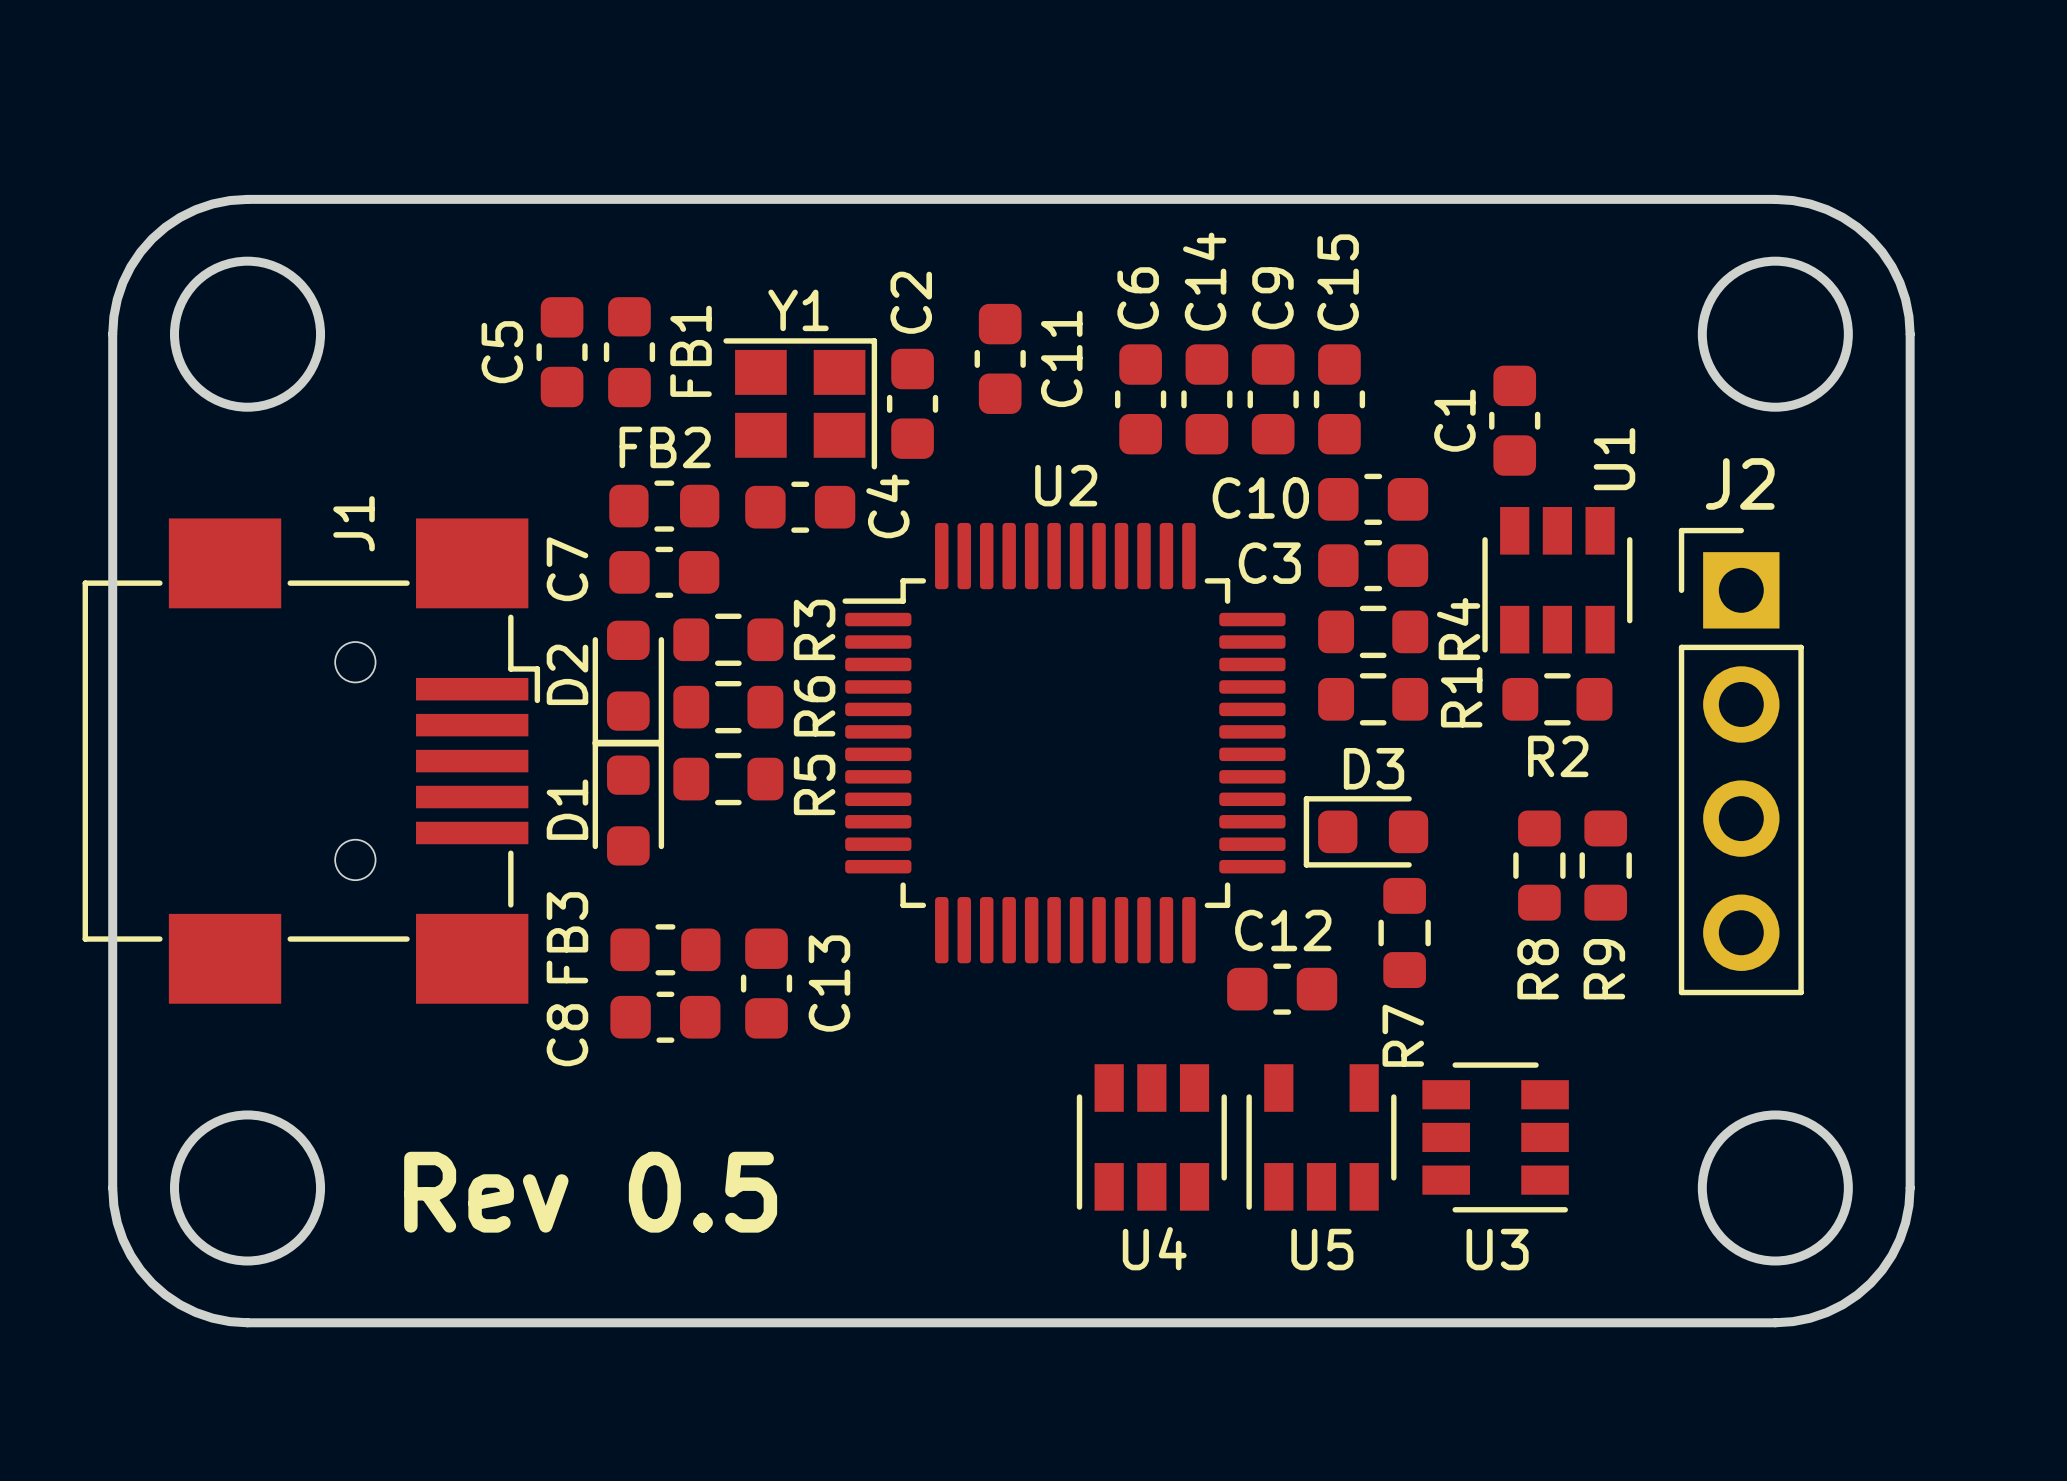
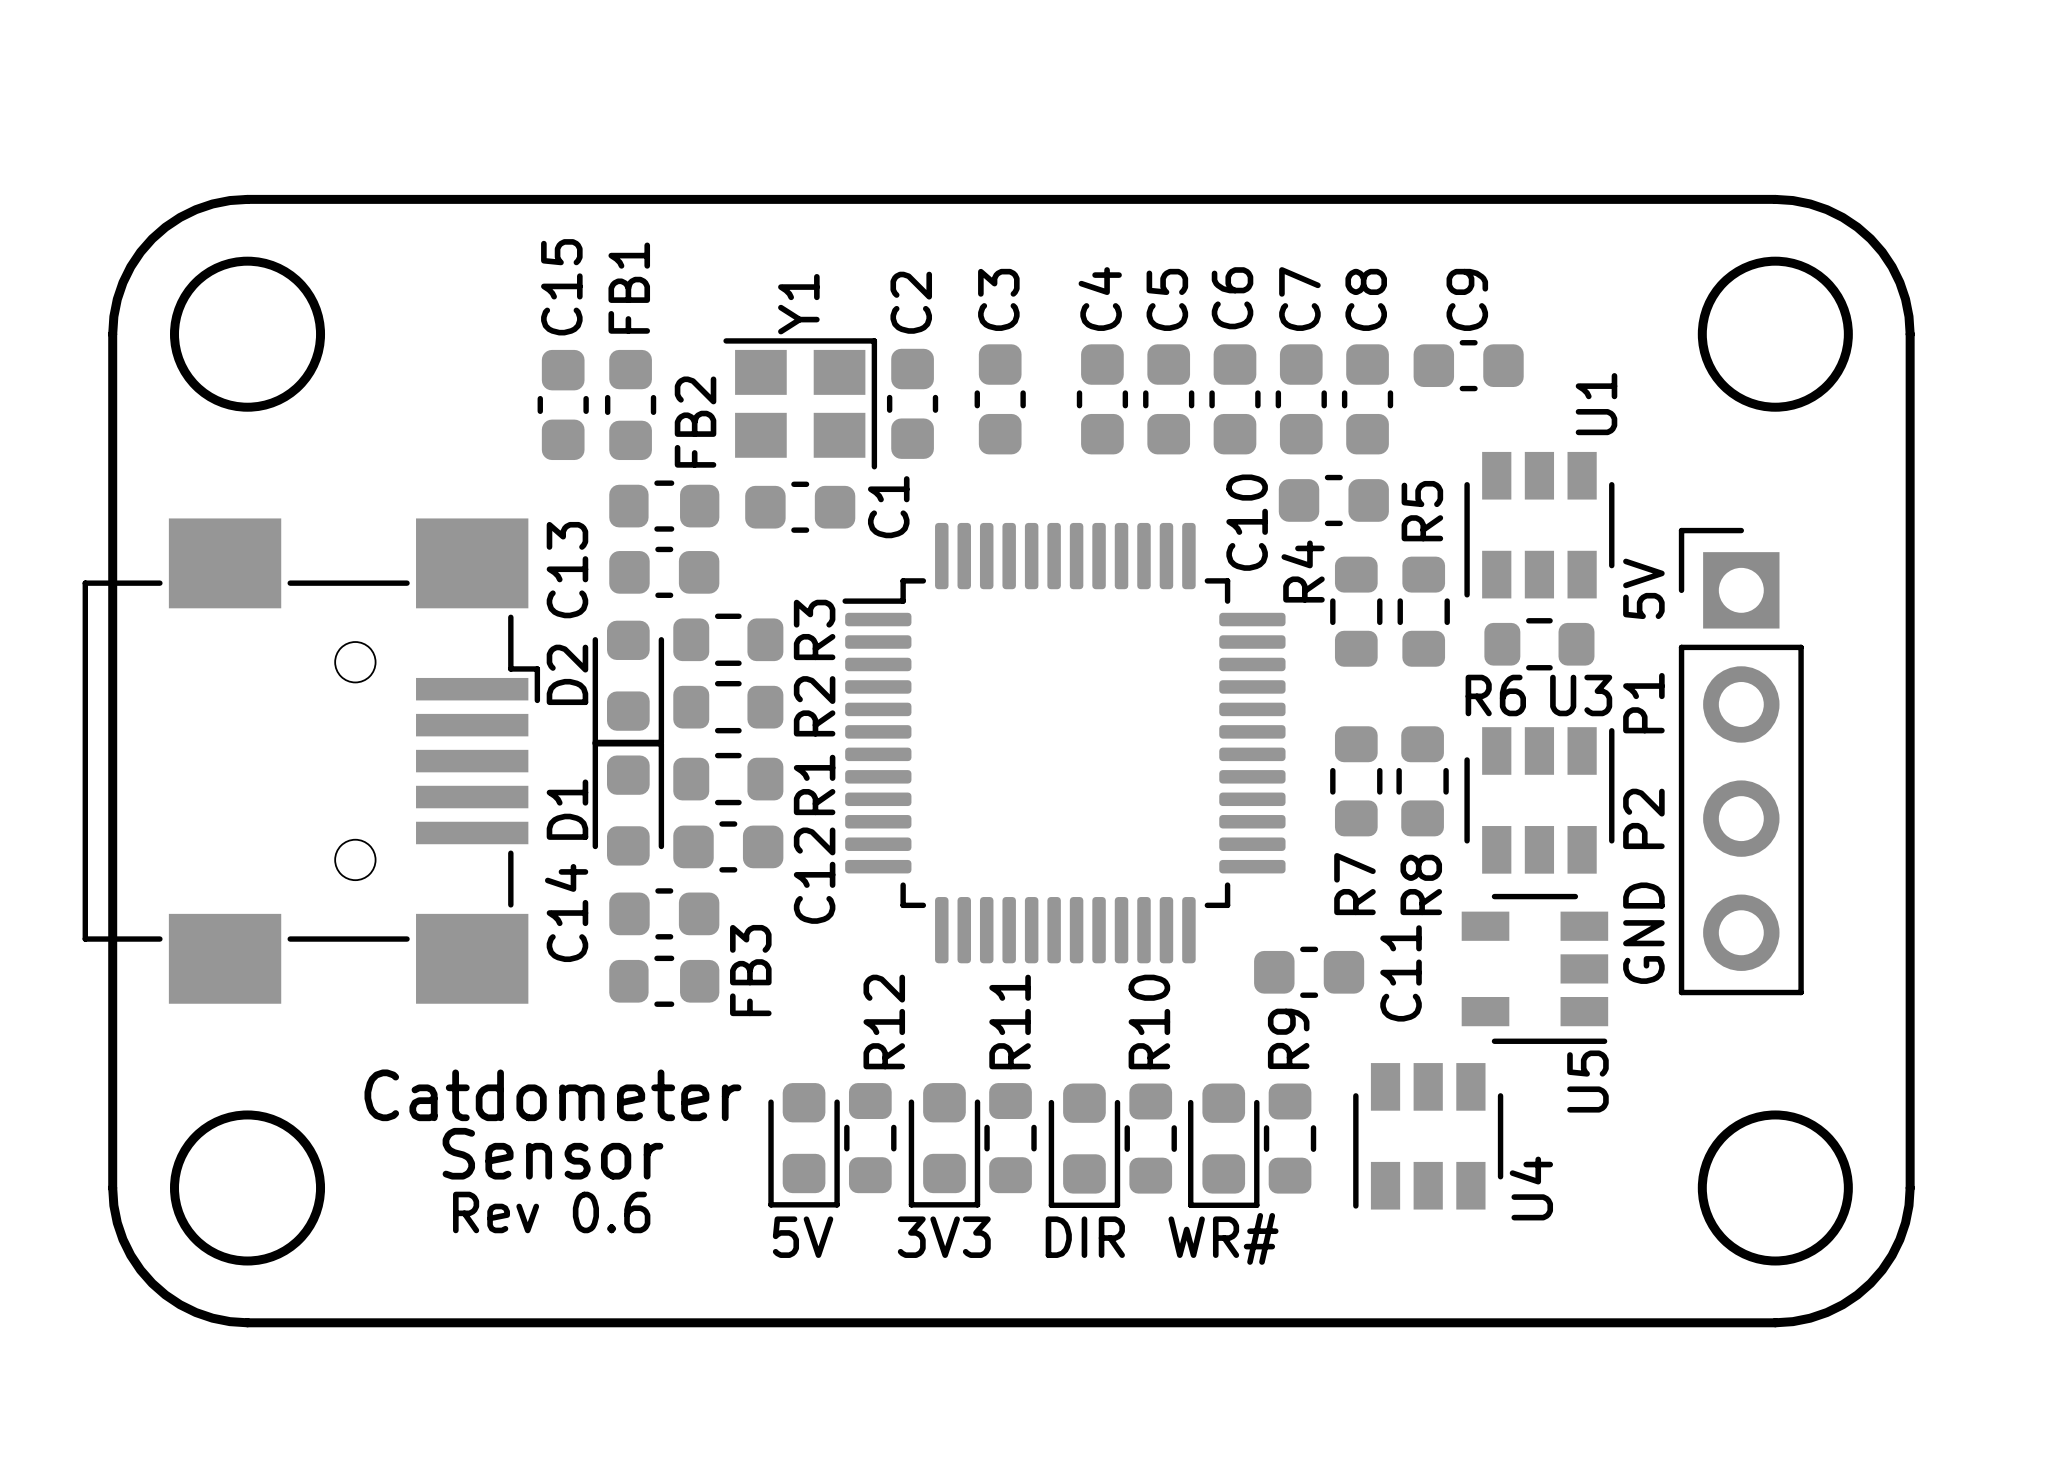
C14 name position: C14 (1204, 281) -> C14 (566, 913)
C15 name position: C15 (1338, 282) -> C15 (561, 287)
Y1 name rotation: 0° (798, 310) -> 90° counterclockwise (798, 304)
FB1 name position: FB1 (691, 351) -> FB1 (629, 288)
C5 name position: C5 (502, 352) -> C5 (1167, 299)
C5 position: (562, 352) -> (1168, 399)
FB1 position: (629, 352) -> (630, 404)
C11 rotation: 0° (1000, 358) -> 90° clockwise (1309, 972)
C11 position: (1000, 358) -> (1309, 972)
C4: none -> (1102, 399)
C6 position: (1140, 399) -> (1234, 399)
C14 rotation: 0° (1206, 399) -> 90° clockwise (664, 913)
C14 position: (1206, 399) -> (664, 913)
C9 rotation: 0° (1273, 399) -> 90° clockwise (1468, 365)
C9 position: (1273, 399) -> (1468, 365)
C7: none -> (1301, 399)
C15 position: (1339, 399) -> (563, 404)
C1: (1514, 420) -> none
FB2 name rotation: 0° (665, 447) -> 90° counterclockwise (695, 422)
J2 name: J2 (1740, 483) -> none
U2 name: U2 (1066, 485) -> none
C10 name rotation: 0° (1260, 497) -> 90° counterclockwise (1247, 522)
C10 position: (1373, 499) -> (1333, 500)
C4 name: C4 (887, 506) -> C1 (888, 507)
J1 name: J1 (354, 523) -> none
C3 rotation: 0° (1373, 565) -> 90° clockwise (1000, 399)
C3 position: (1373, 565) -> (1000, 399)
C7 name: C7 (567, 569) -> C13 (567, 570)
U1 position: (1557, 580) -> (1539, 525)
text: none -> 5V (1643, 588)
R5: none -> (1423, 611)
R4 name position: R4 (1458, 629) -> R4 (1303, 571)
R4 rotation: 0° (1373, 631) -> 90° clockwise (1356, 611)
R6: none -> (1539, 644)
R1: (1373, 699) -> none
R2: (1557, 699) -> none
text: none -> P1 (1643, 703)
R6 name: R6 (814, 706) -> R2 (814, 706)
R5 name: R5 (814, 784) -> R1 (814, 784)
text: none -> P2 (1643, 818)
D3: (1365, 831) -> none
R8 position: (1539, 865) -> (1422, 781)
R9 position: (1605, 865) -> (1290, 1138)
C12 name rotation: 0° (1283, 930) -> 90° counterclockwise (814, 875)
R7 position: (1404, 932) -> (1356, 781)
text: none -> GND (1643, 933)
FB3 name position: FB3 (567, 937) -> FB3 (750, 970)
FB3 position: (665, 949) -> (664, 981)
R9 name position: R9 (1604, 969) -> R9 (1288, 1038)
C13: (766, 983) -> none
C12 position: (1282, 989) -> (728, 846)
C8 rotation: 0° (665, 1017) -> 90° clockwise (1367, 399)
C8 position: (665, 1017) -> (1367, 399)
text: none -> Catdometer (552, 1095)
U4 position: (1151, 1137) -> (1428, 1136)
U5 rotation: 0° (1321, 1137) -> 90° counterclockwise (1534, 968)
U5 position: (1321, 1137) -> (1534, 968)
U3 rotation: 0° (1495, 1137) -> 90° counterclockwise (1539, 800)
U3 position: (1495, 1137) -> (1539, 800)
R12: none -> (870, 1138)
R11: none -> (1010, 1138)
R10: none -> (1150, 1138)
part: none -> (804, 1145)
part: none -> (944, 1145)
part: none -> (1084, 1145)
part: none -> (1223, 1145)
text: none -> Sensor (552, 1153)
text: Rev 0.5 (590, 1192) -> Rev 0.6 (551, 1212)
text: none -> 5V (803, 1237)
text: none -> 3V3 (944, 1237)
text: none -> DIR (1085, 1237)
text: none -> WR# (1223, 1238)
U4 name rotation: 0° (1154, 1248) -> 90° counterclockwise (1531, 1188)
U4 name position: U4 (1154, 1248) -> U4 (1531, 1188)
U3 name position: U3 (1497, 1249) -> U3 (1581, 695)

